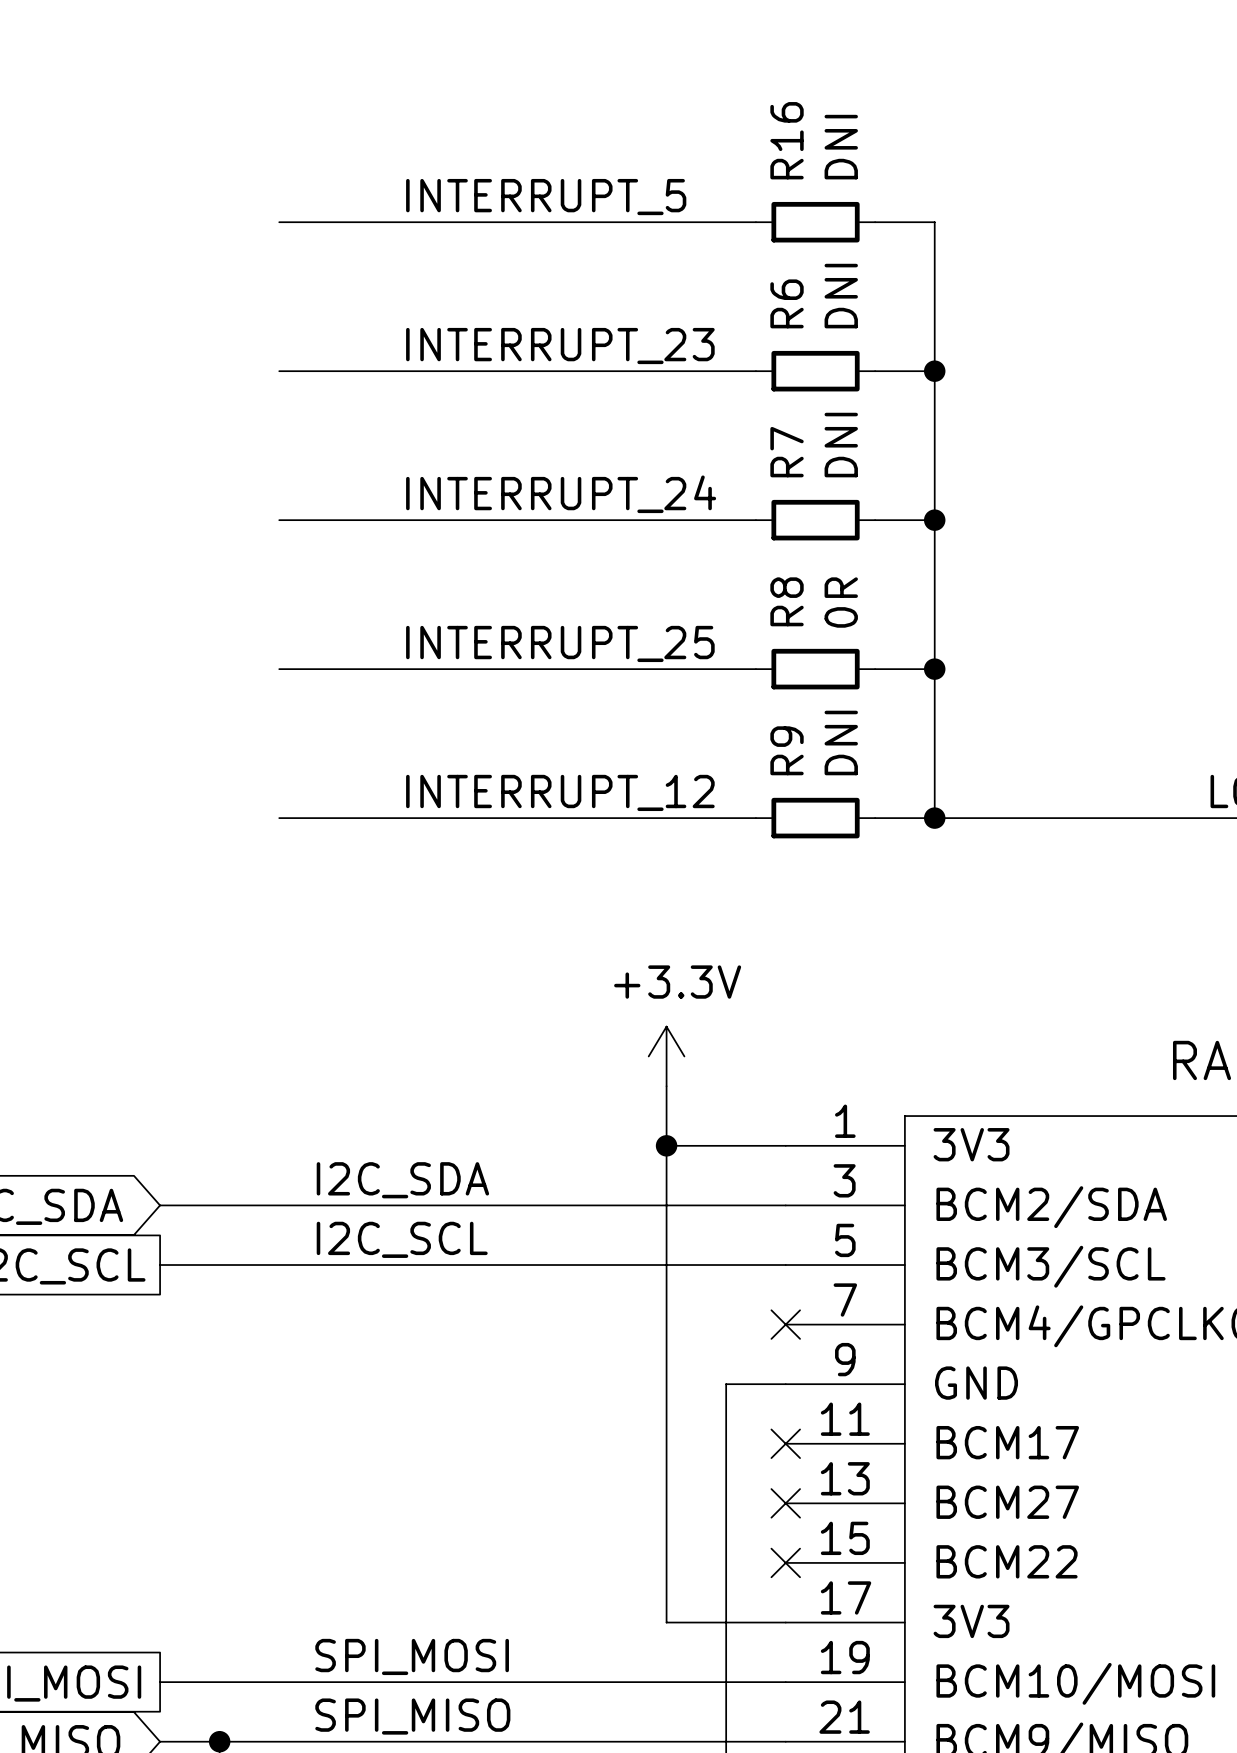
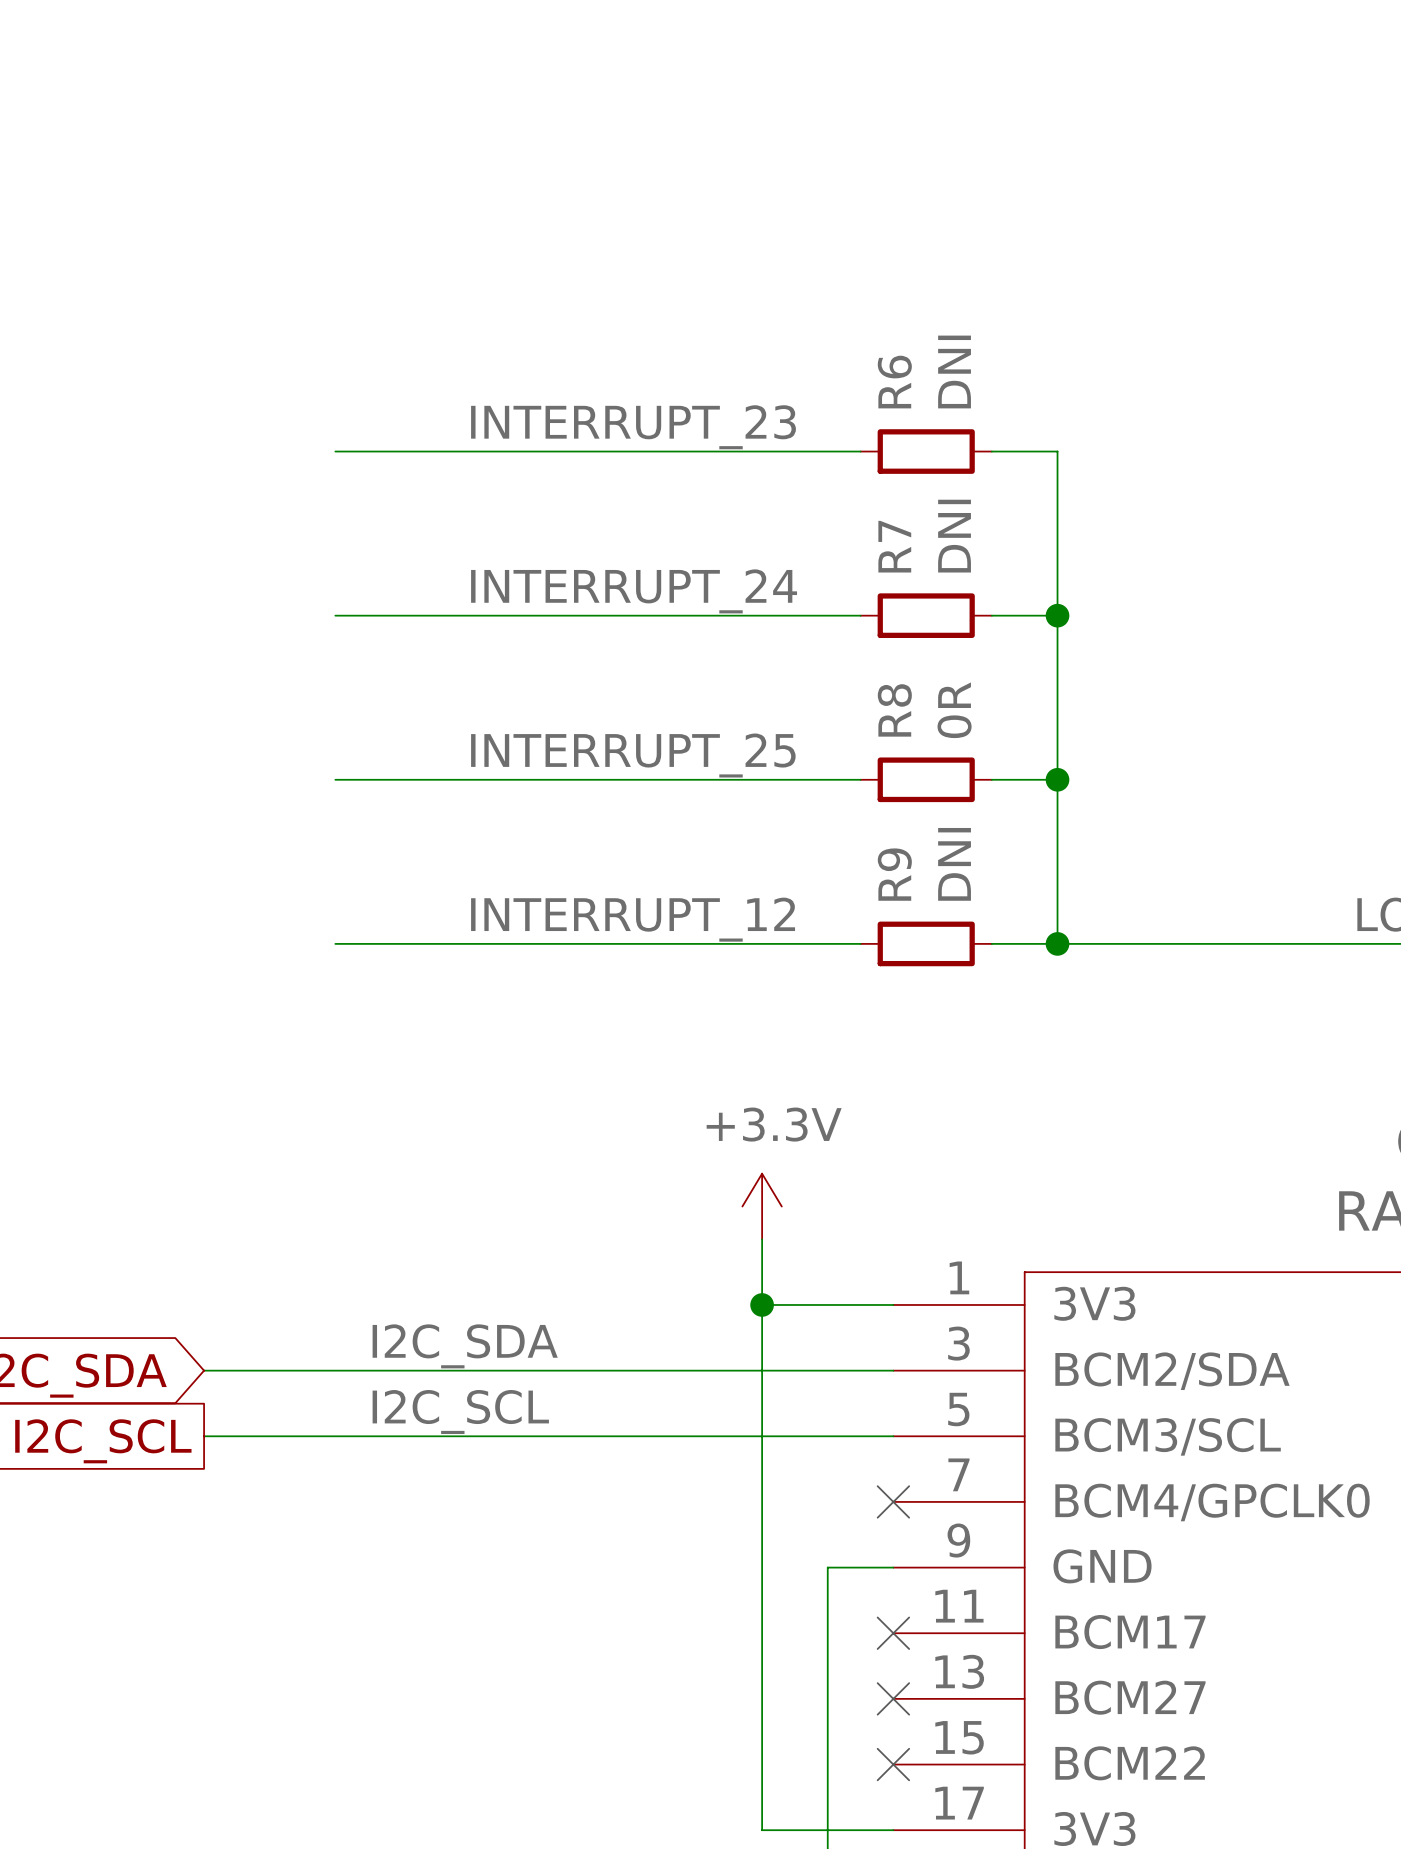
label: INTERRUPT_5 (546, 197) -> none
wire: (279, 222) (755, 222) -> none
R16: DNI (815, 222) -> none
wire: (875, 222) (934, 222) (934, 371) -> none
junction: (934, 371) -> none

